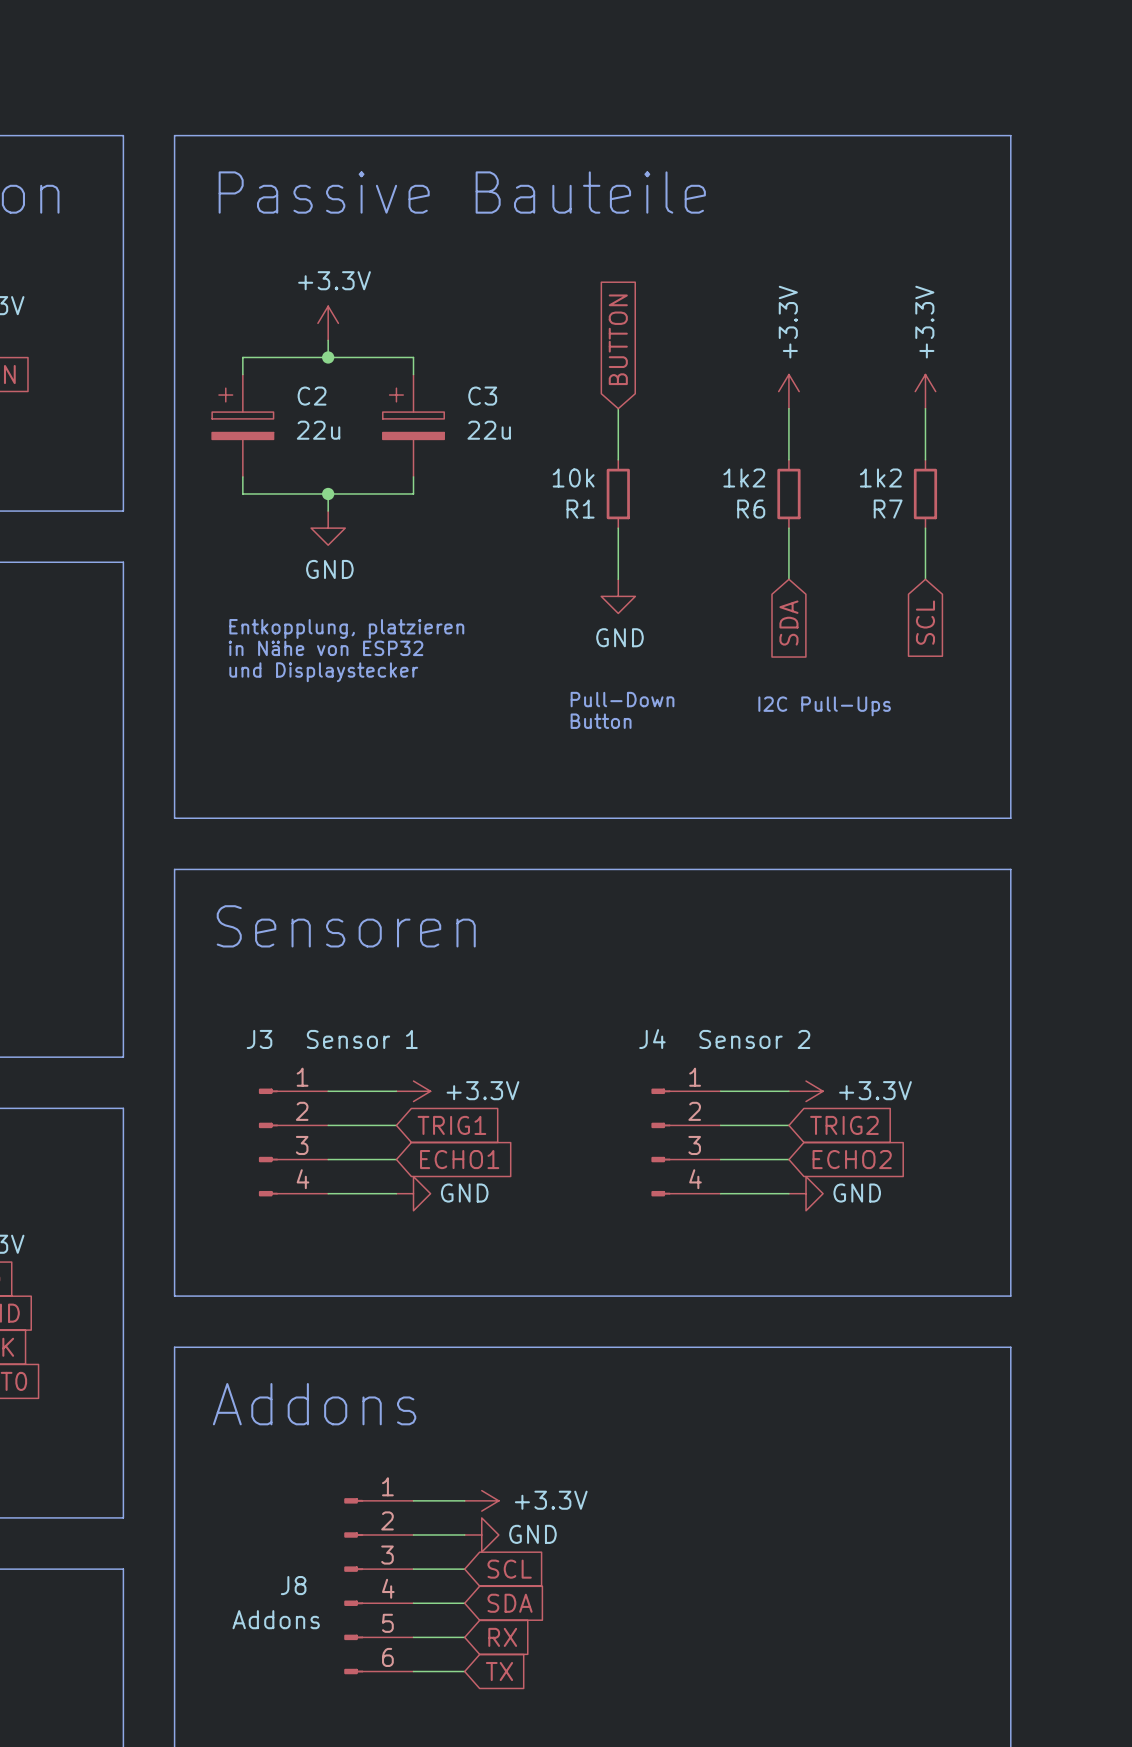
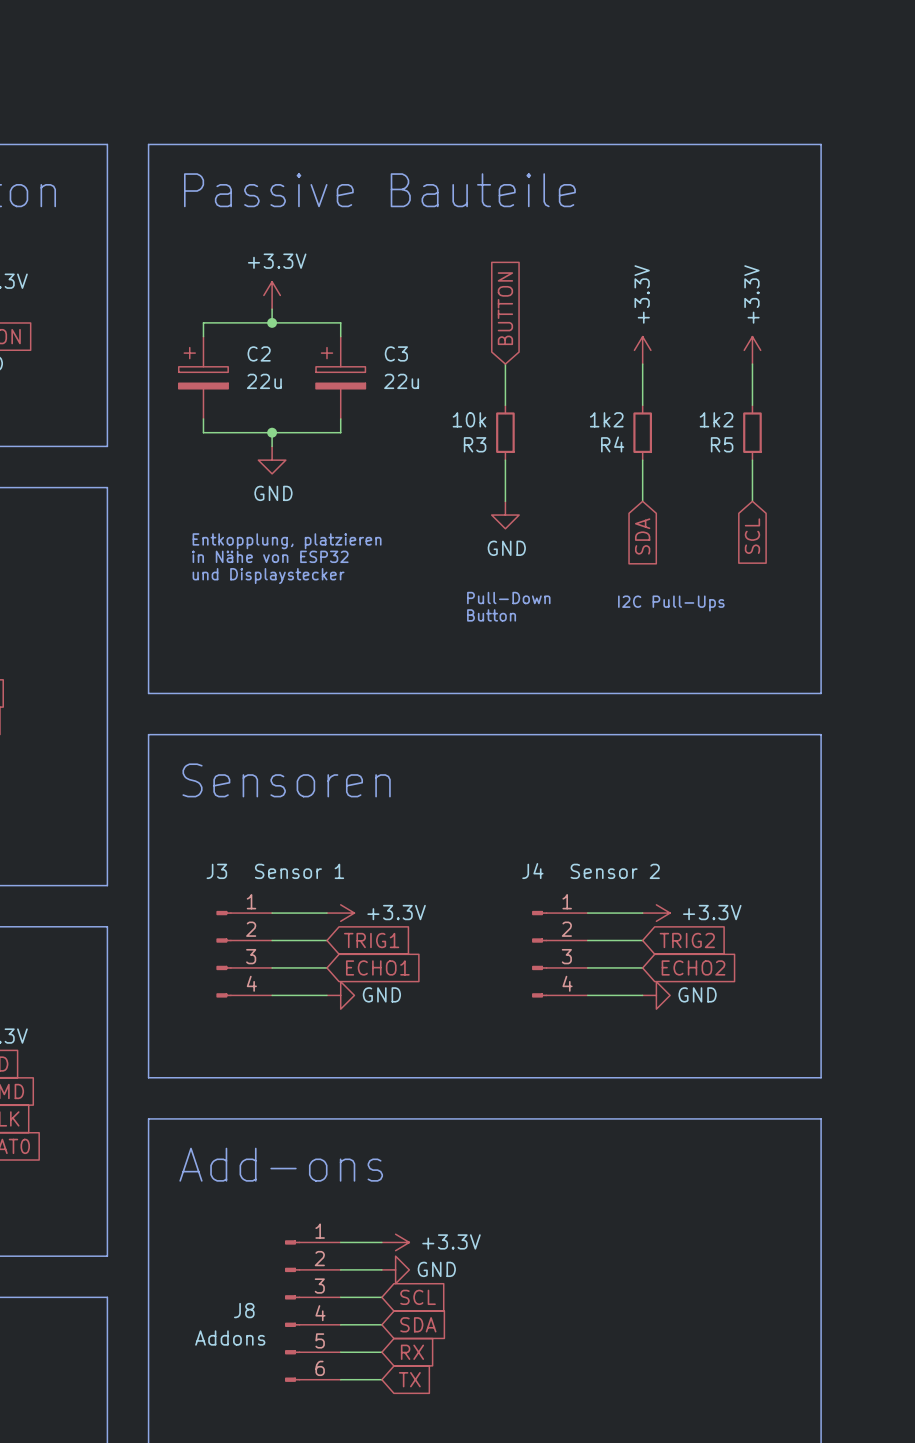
R1 name: R1 (580, 509) -> R3 (475, 444)
R6 name: R6 (751, 509) -> R4 (612, 444)
R7 name: R7 (888, 509) -> R5 (722, 444)
text: Addons (314, 1404) -> Add-ons (281, 1164)

